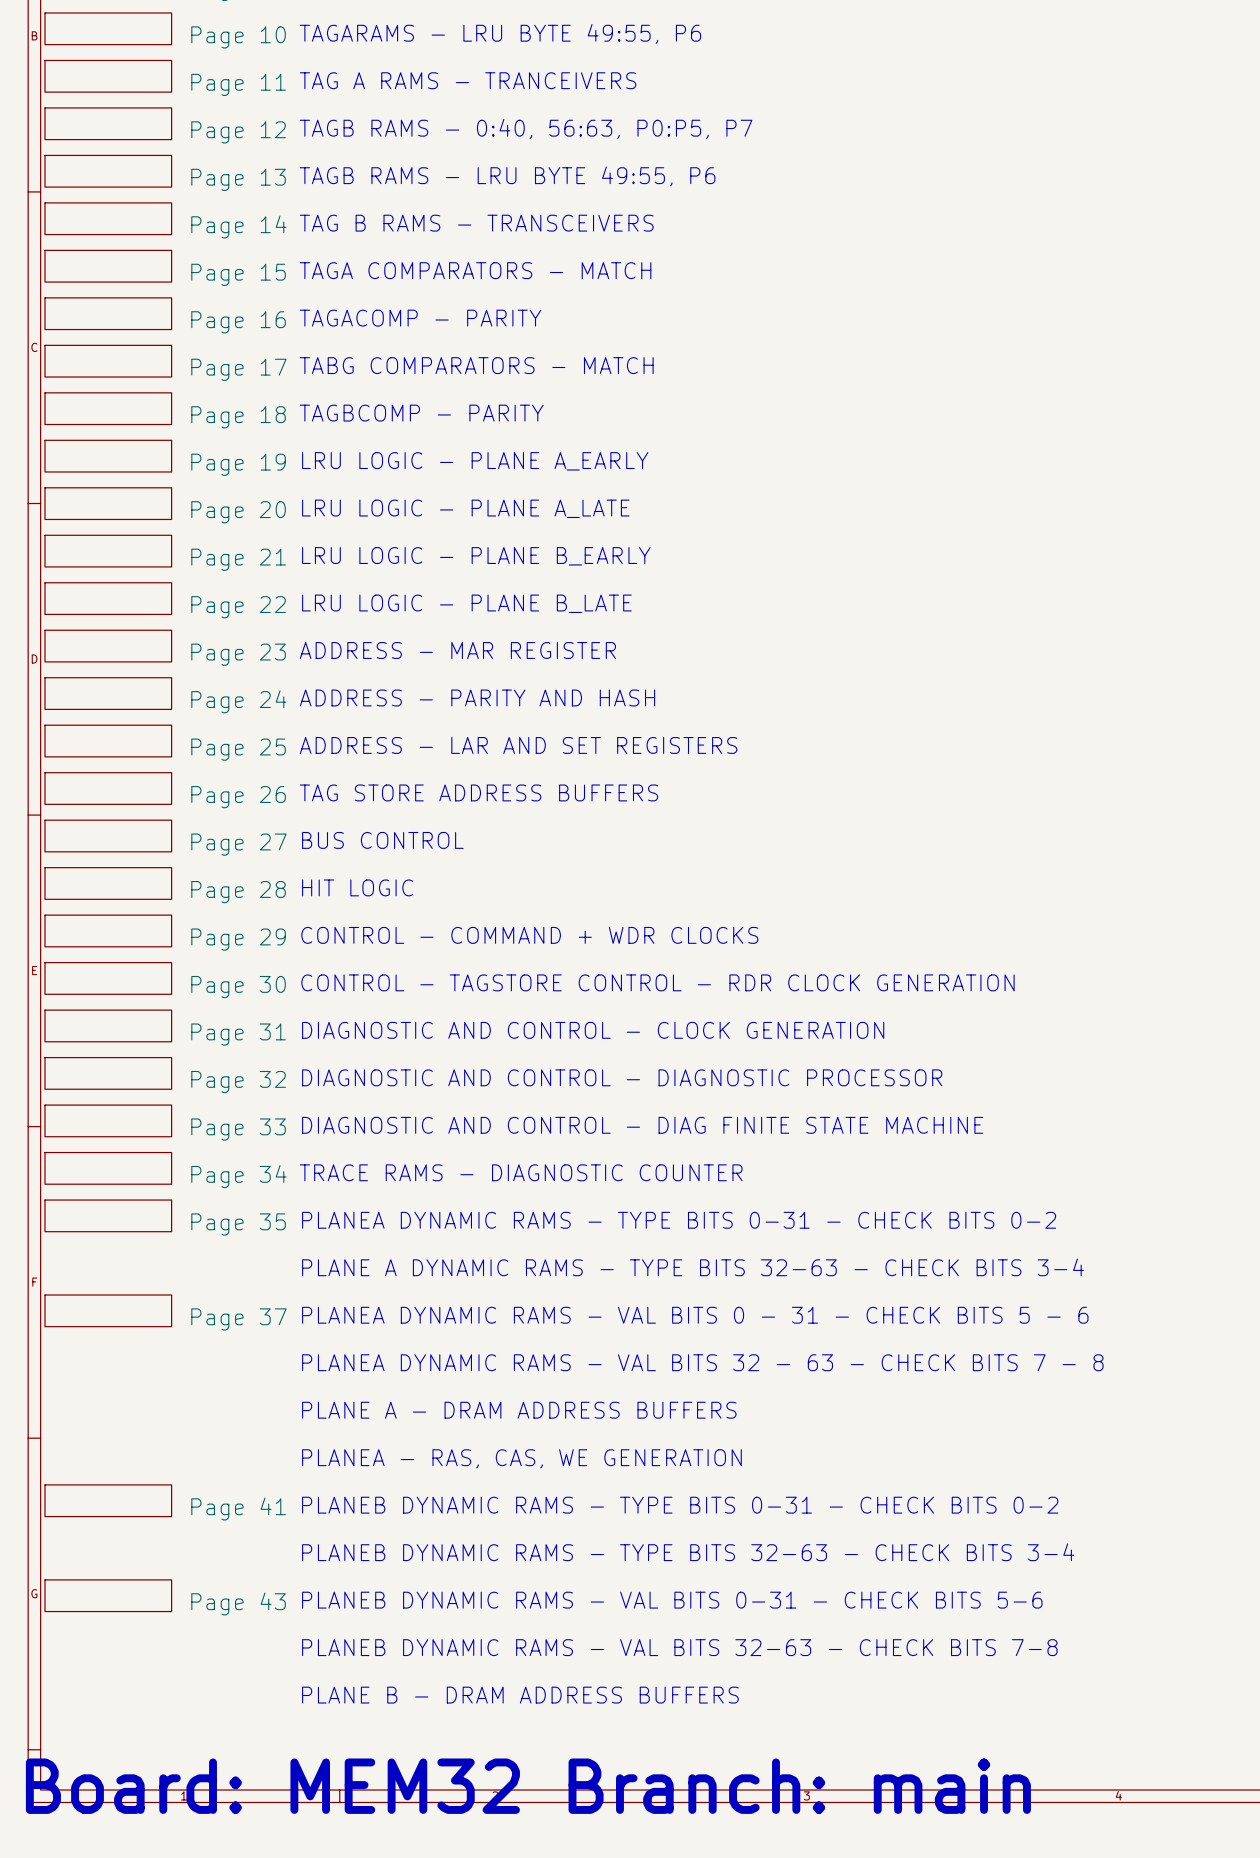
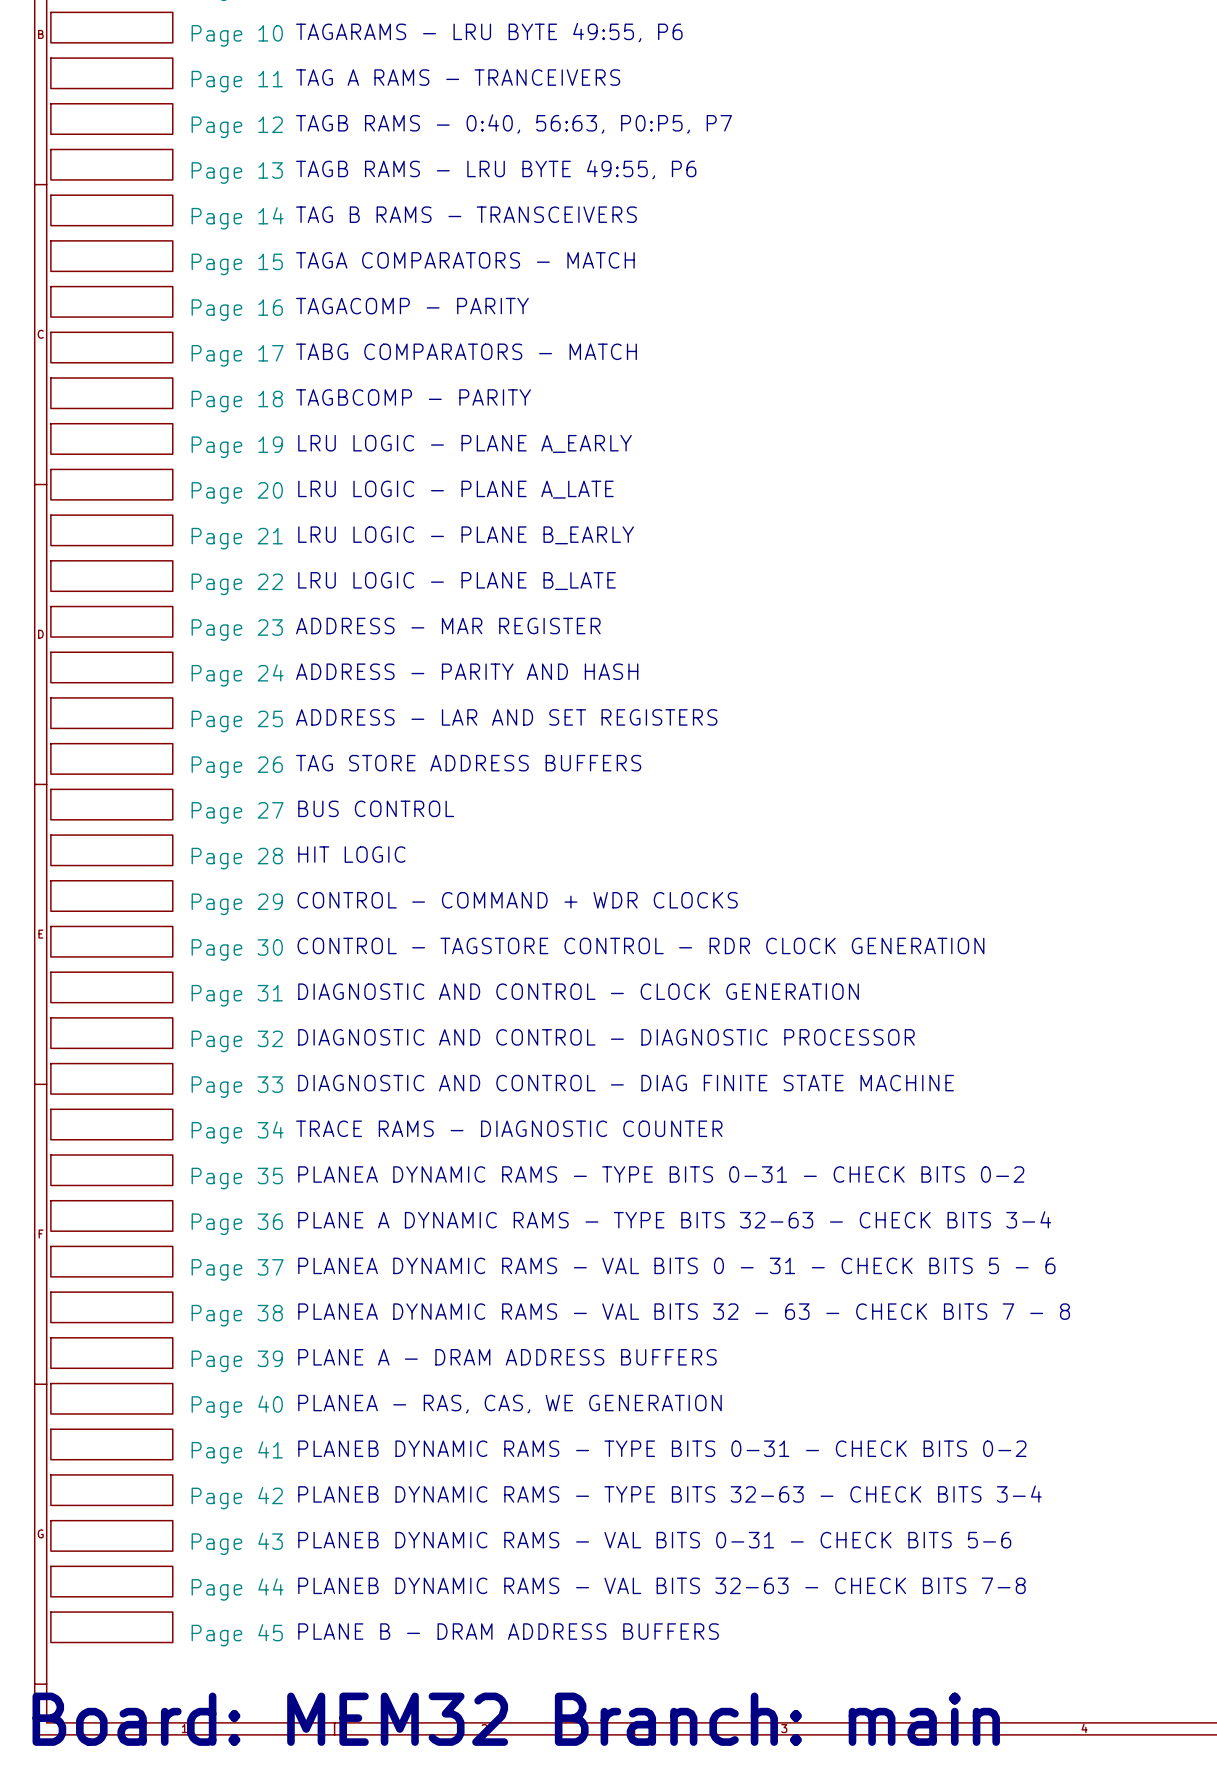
sheet Page 36: none -> (111, 1215)
sheet Page 38: none -> (111, 1307)
sheet Page 39: none -> (111, 1353)
sheet Page 40: none -> (111, 1398)
sheet Page 42: none -> (111, 1490)
sheet Page 44: none -> (111, 1581)
sheet Page 45: none -> (111, 1627)

